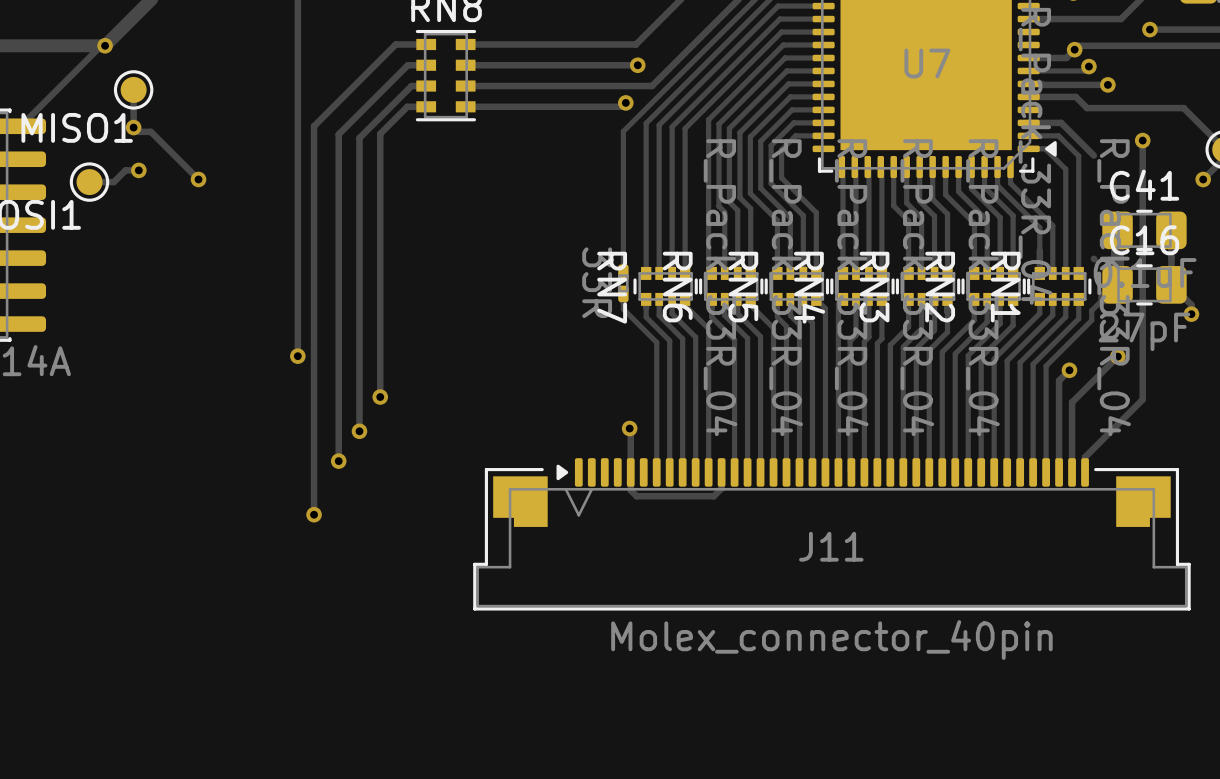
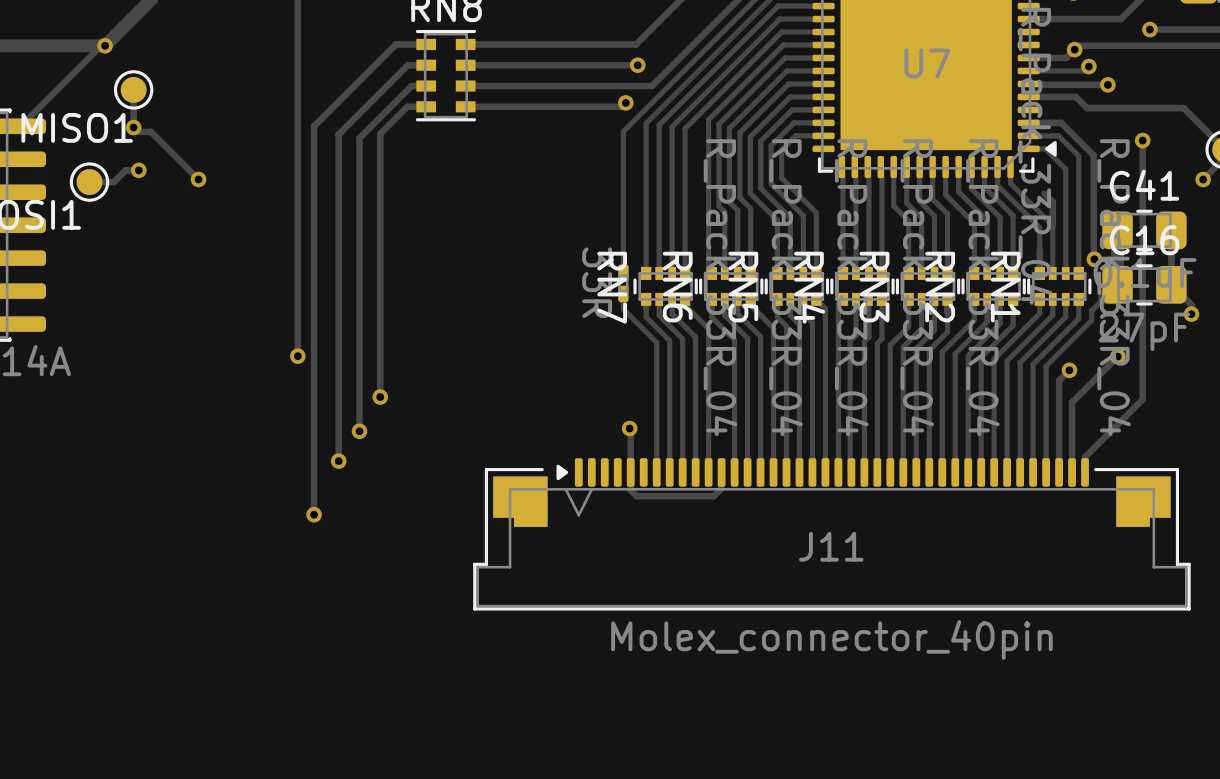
track: none -> (1093, 155) (1093, 258)
track: none -> (1044, 193) (1052, 201) (1052, 225)
via: none -> (1094, 259)

